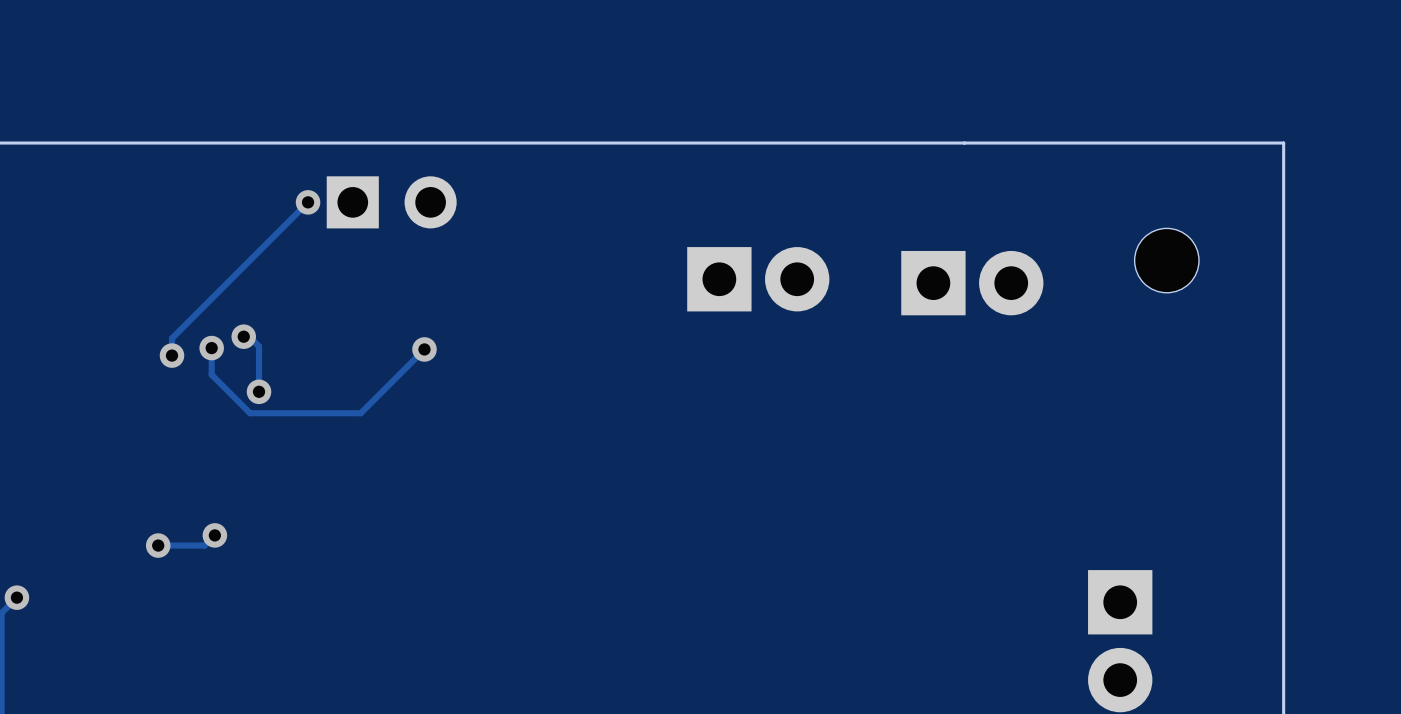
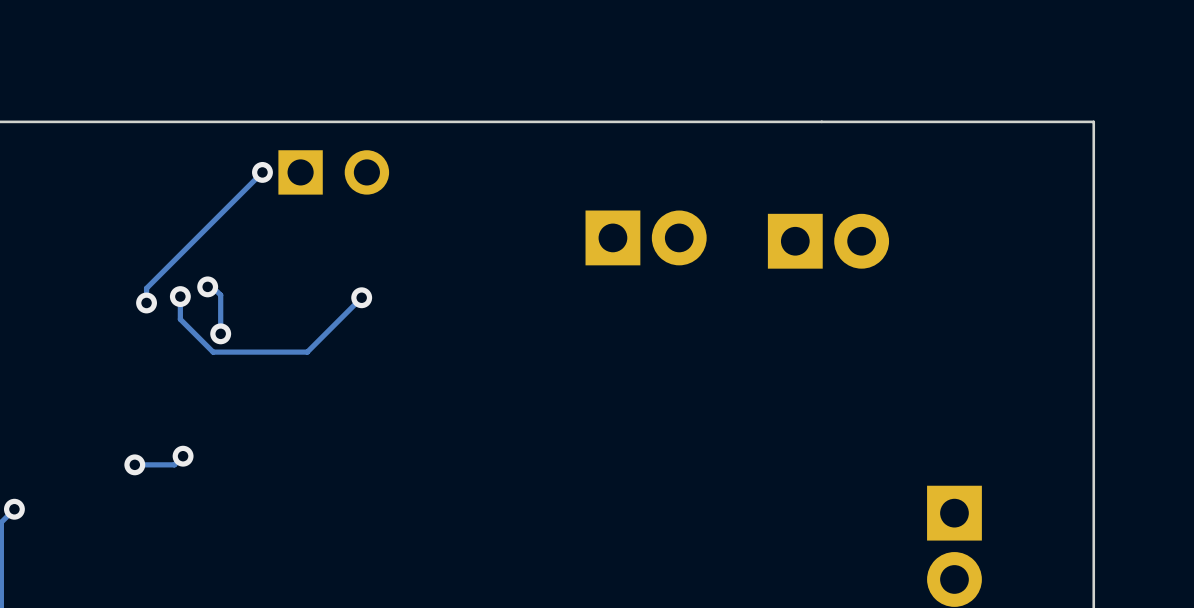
part: (1166, 260) -> none

